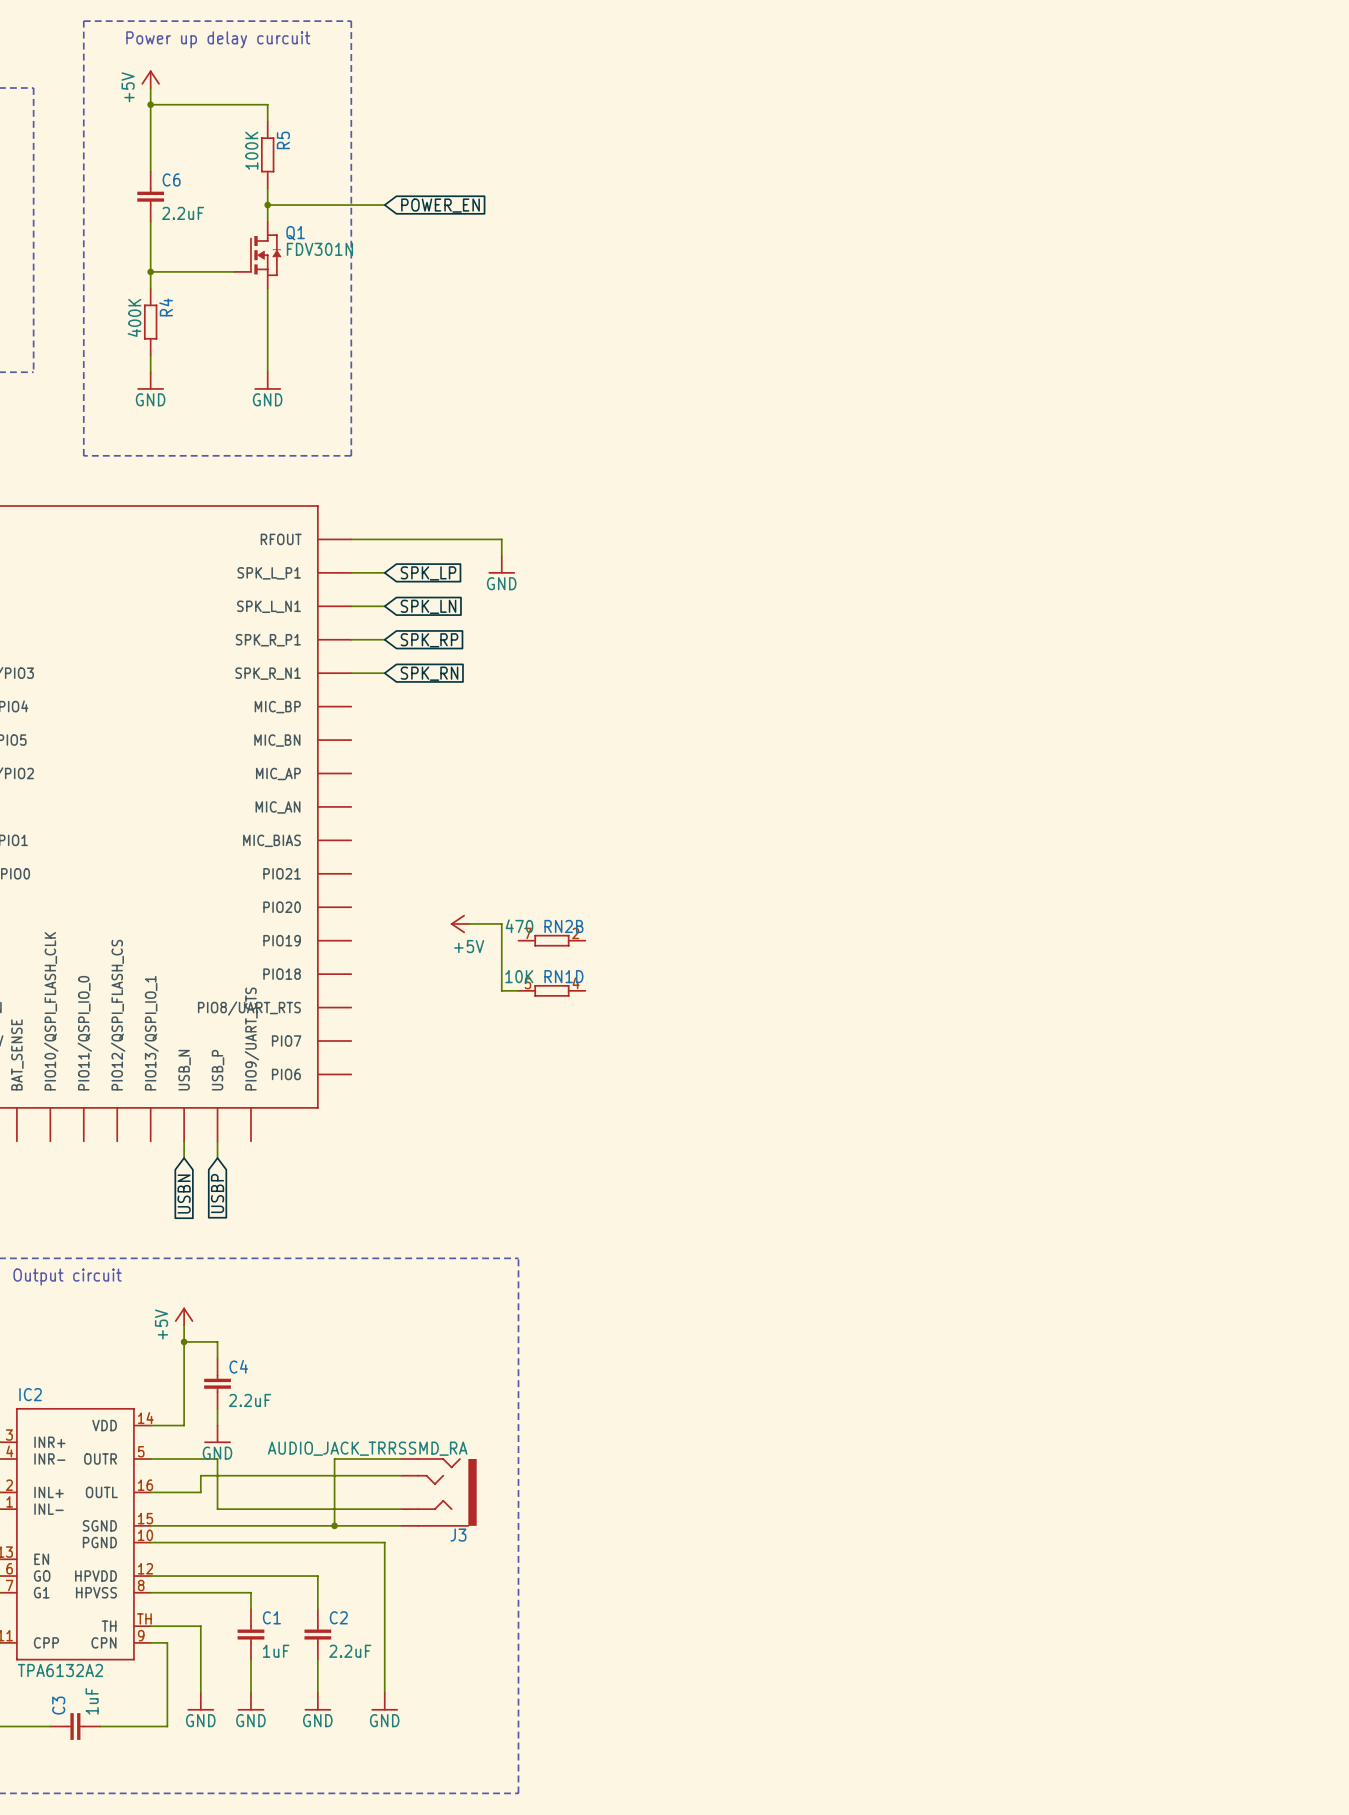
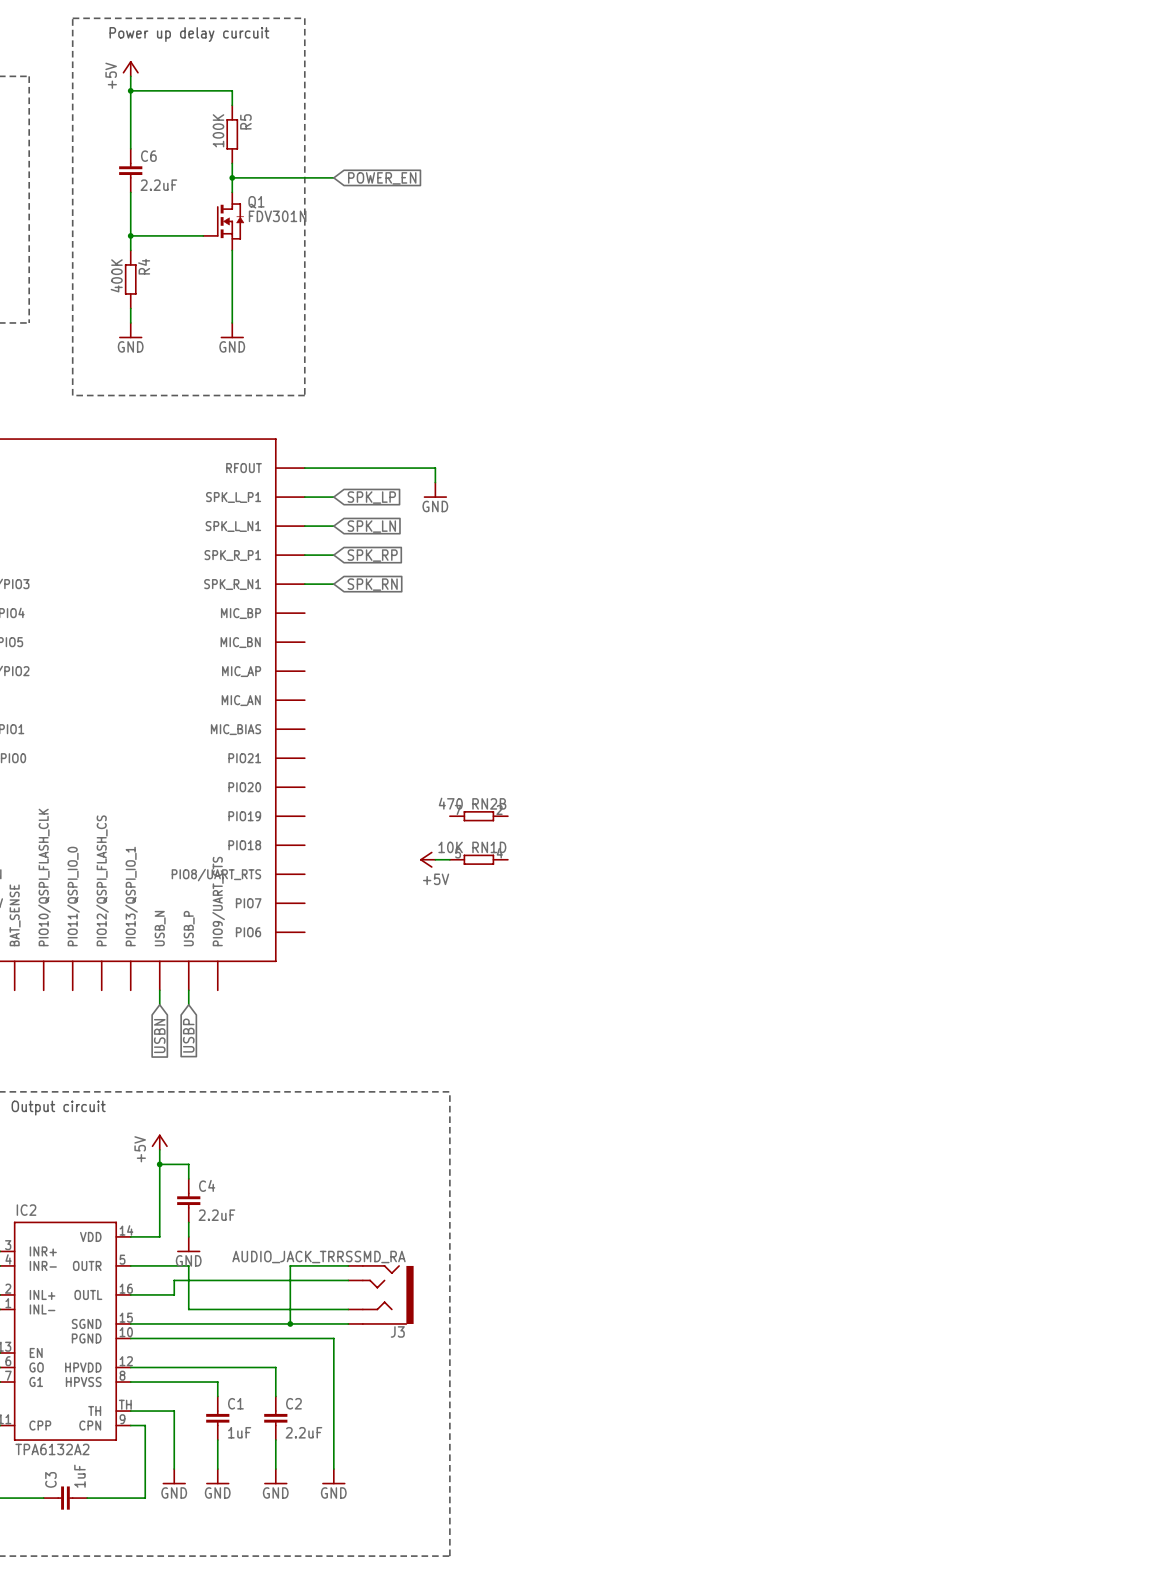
power symbol position: +5V (459, 923) -> +5V (427, 859)
wire: (468, 923) (501, 923) (501, 990) -> none

